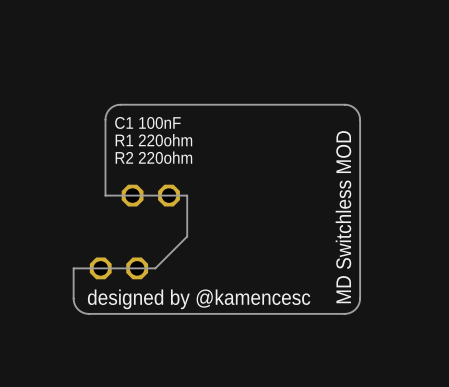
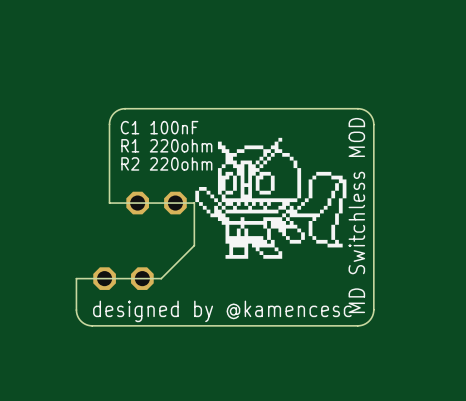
drawing: none -> [195, 137, 347, 259]

